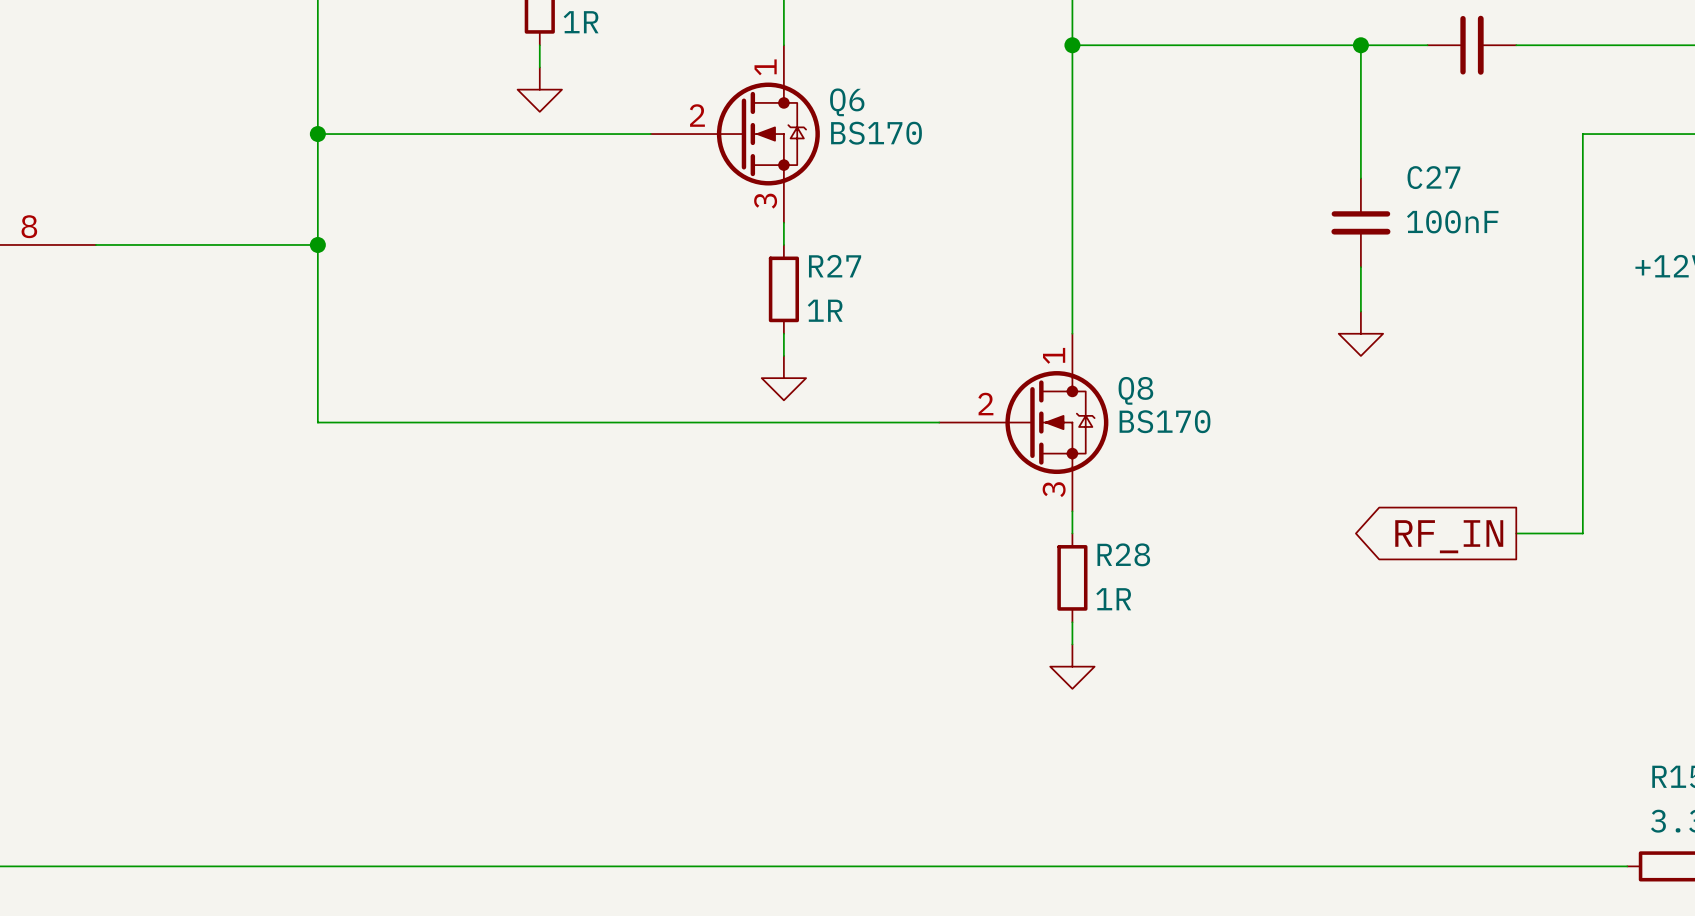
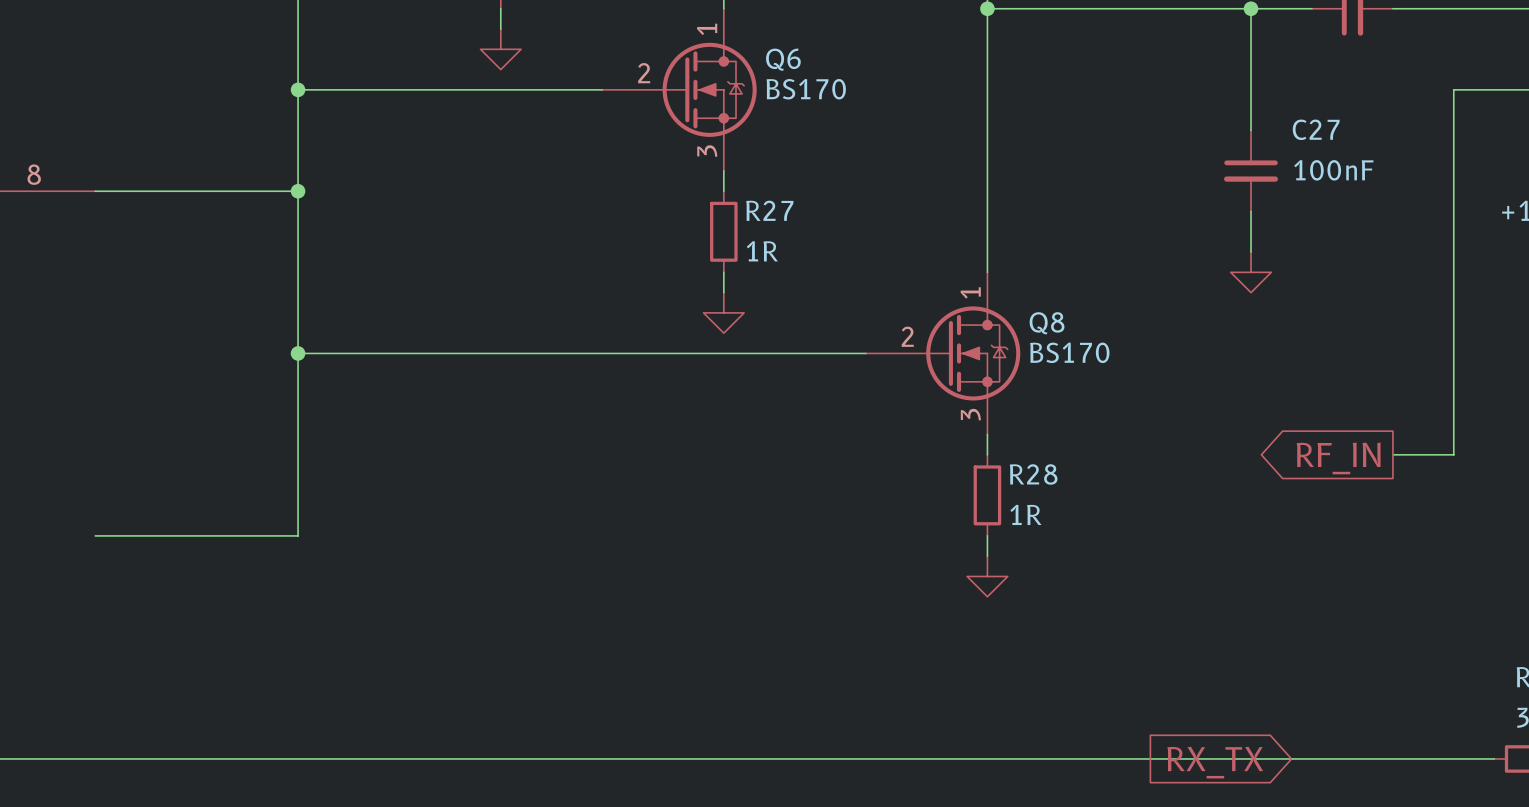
wire: none -> (298, 353) (298, 535) (95, 535)
junction: none -> (298, 353)
global label: none -> RX_TX (1215, 762)

